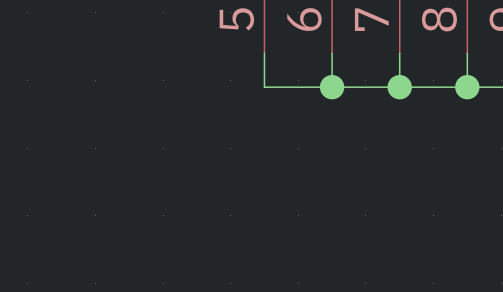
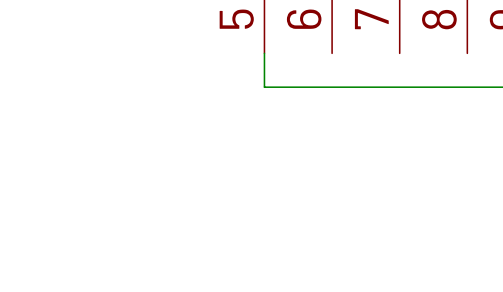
wire: (332, 53) (332, 87) -> none
wire: (399, 53) (399, 87) -> none
wire: (467, 53) (467, 87) -> none
junction: (332, 87) -> none
junction: (399, 87) -> none
junction: (467, 87) -> none

